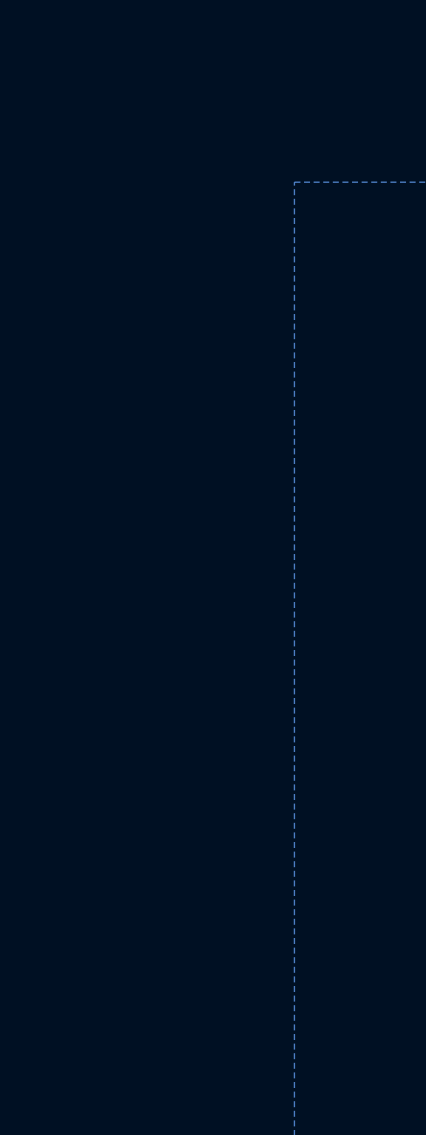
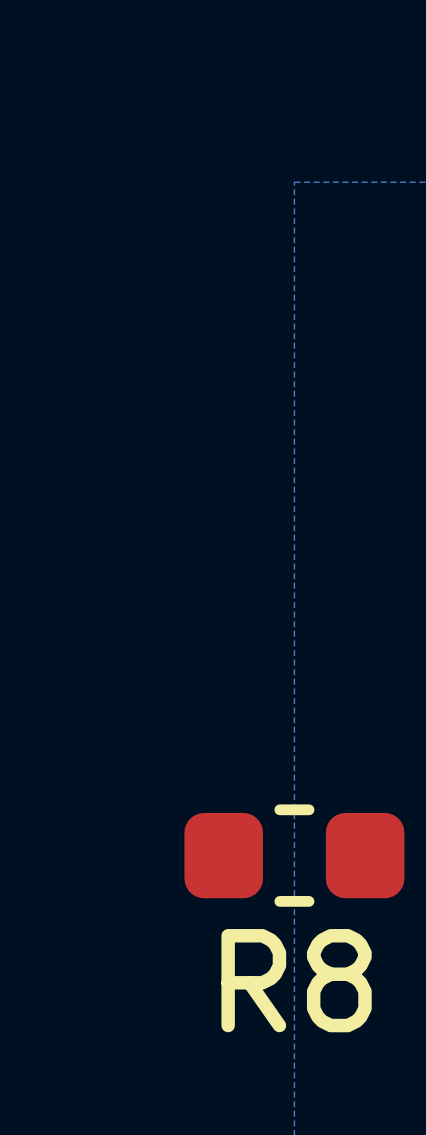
R8: none -> (294, 855)

